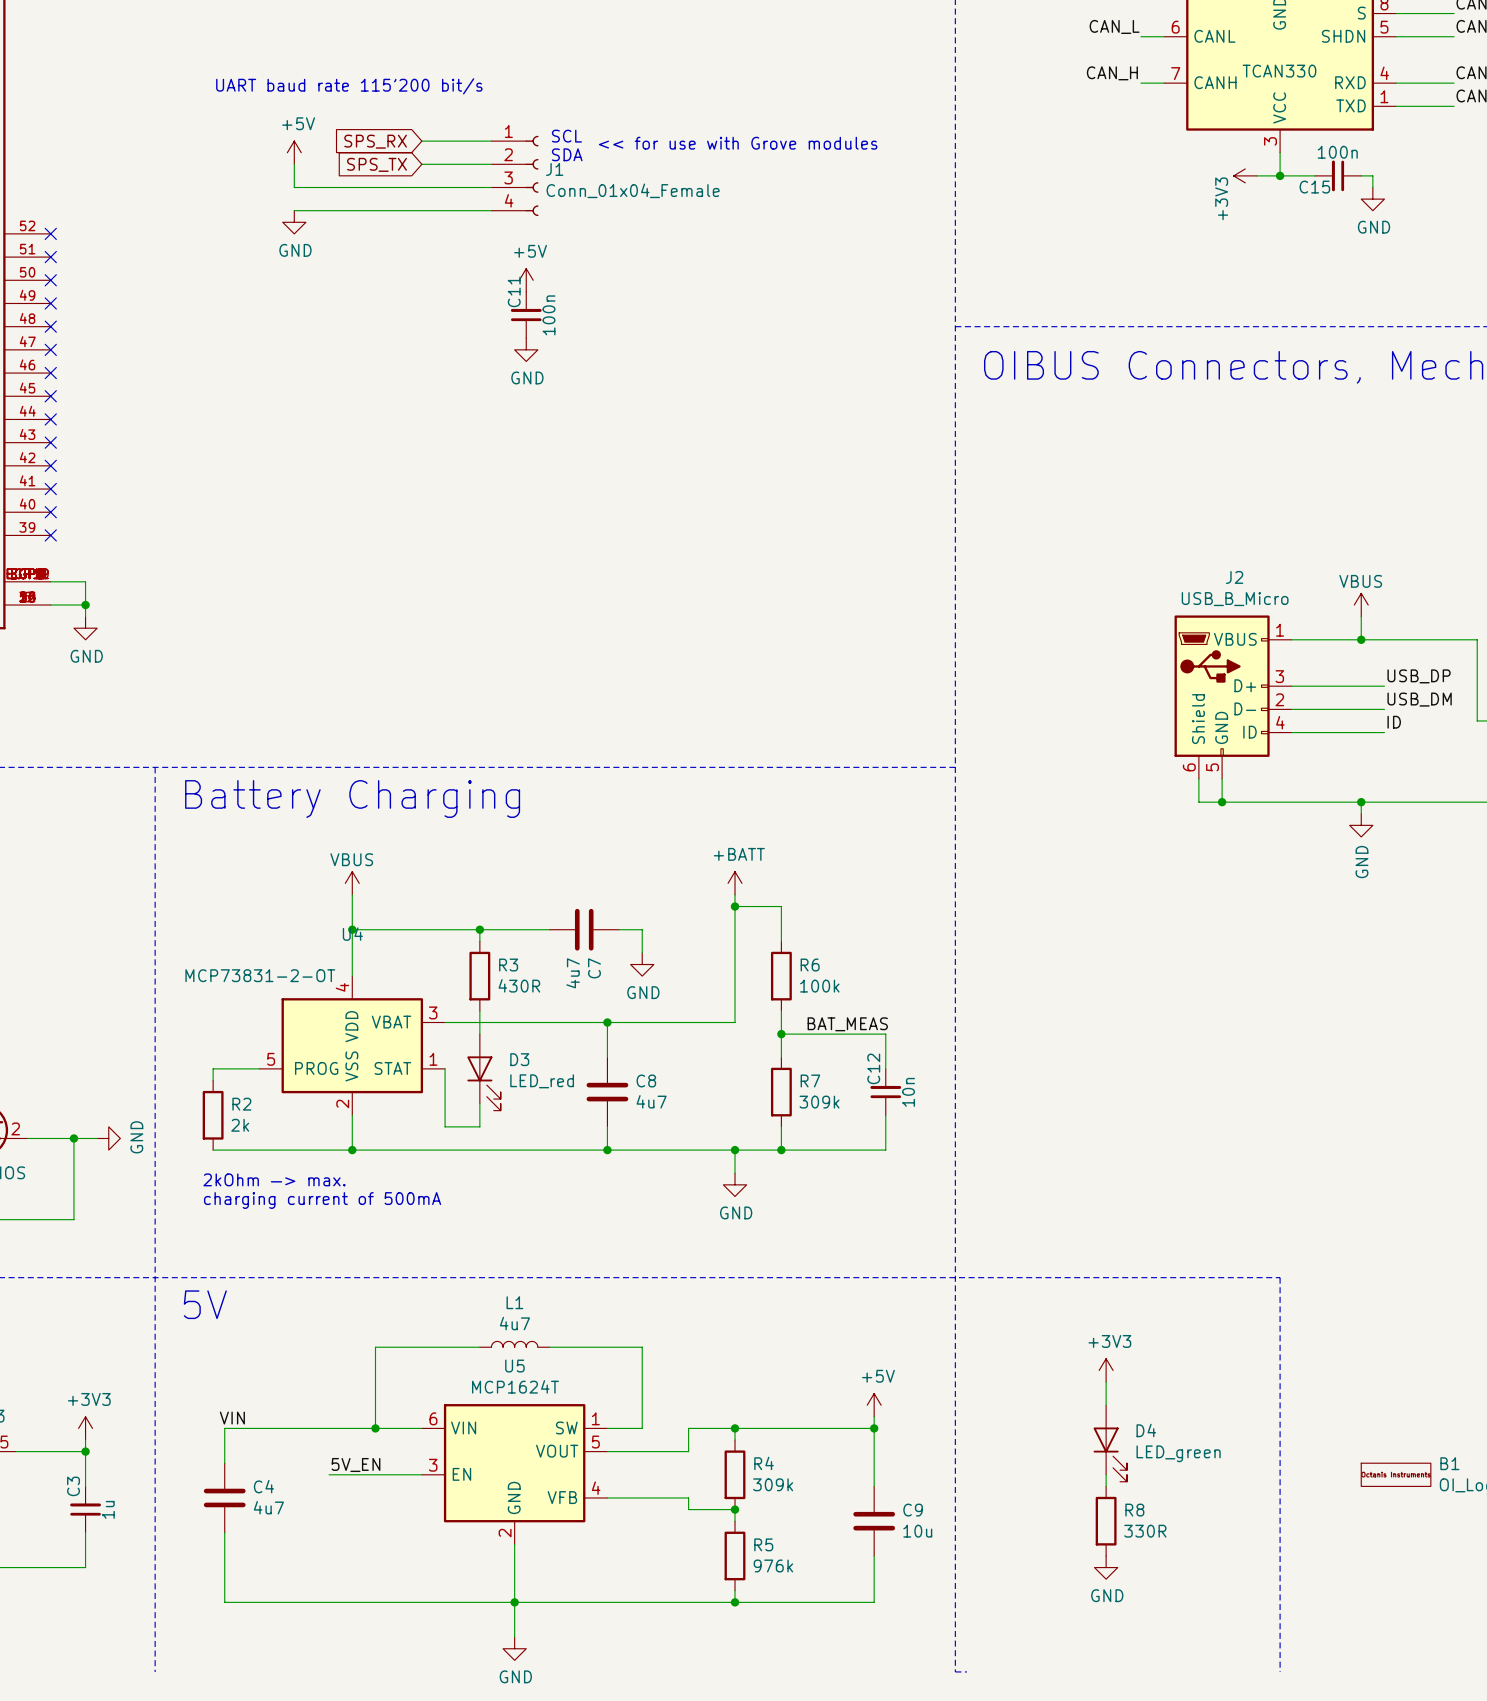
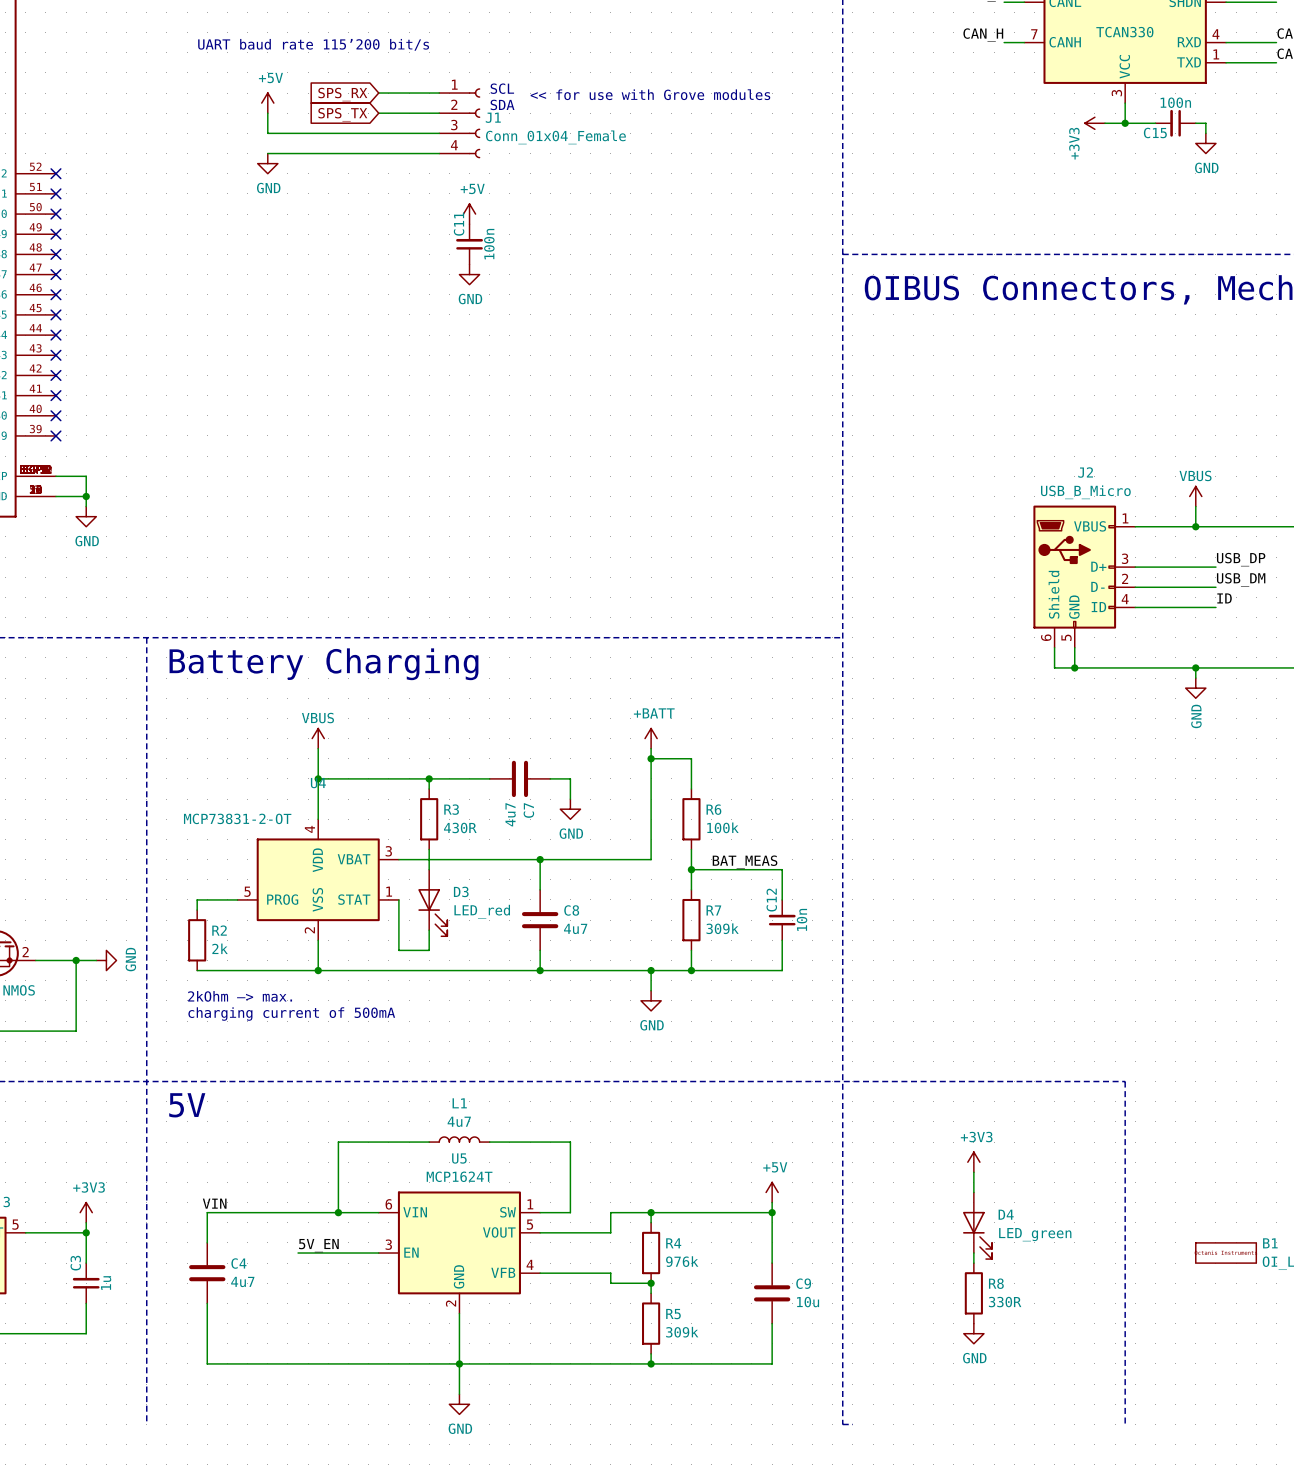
R4 value: 309k (773, 1484) -> 976k (682, 1261)
R5 value: 976k (773, 1565) -> 309k (682, 1332)

